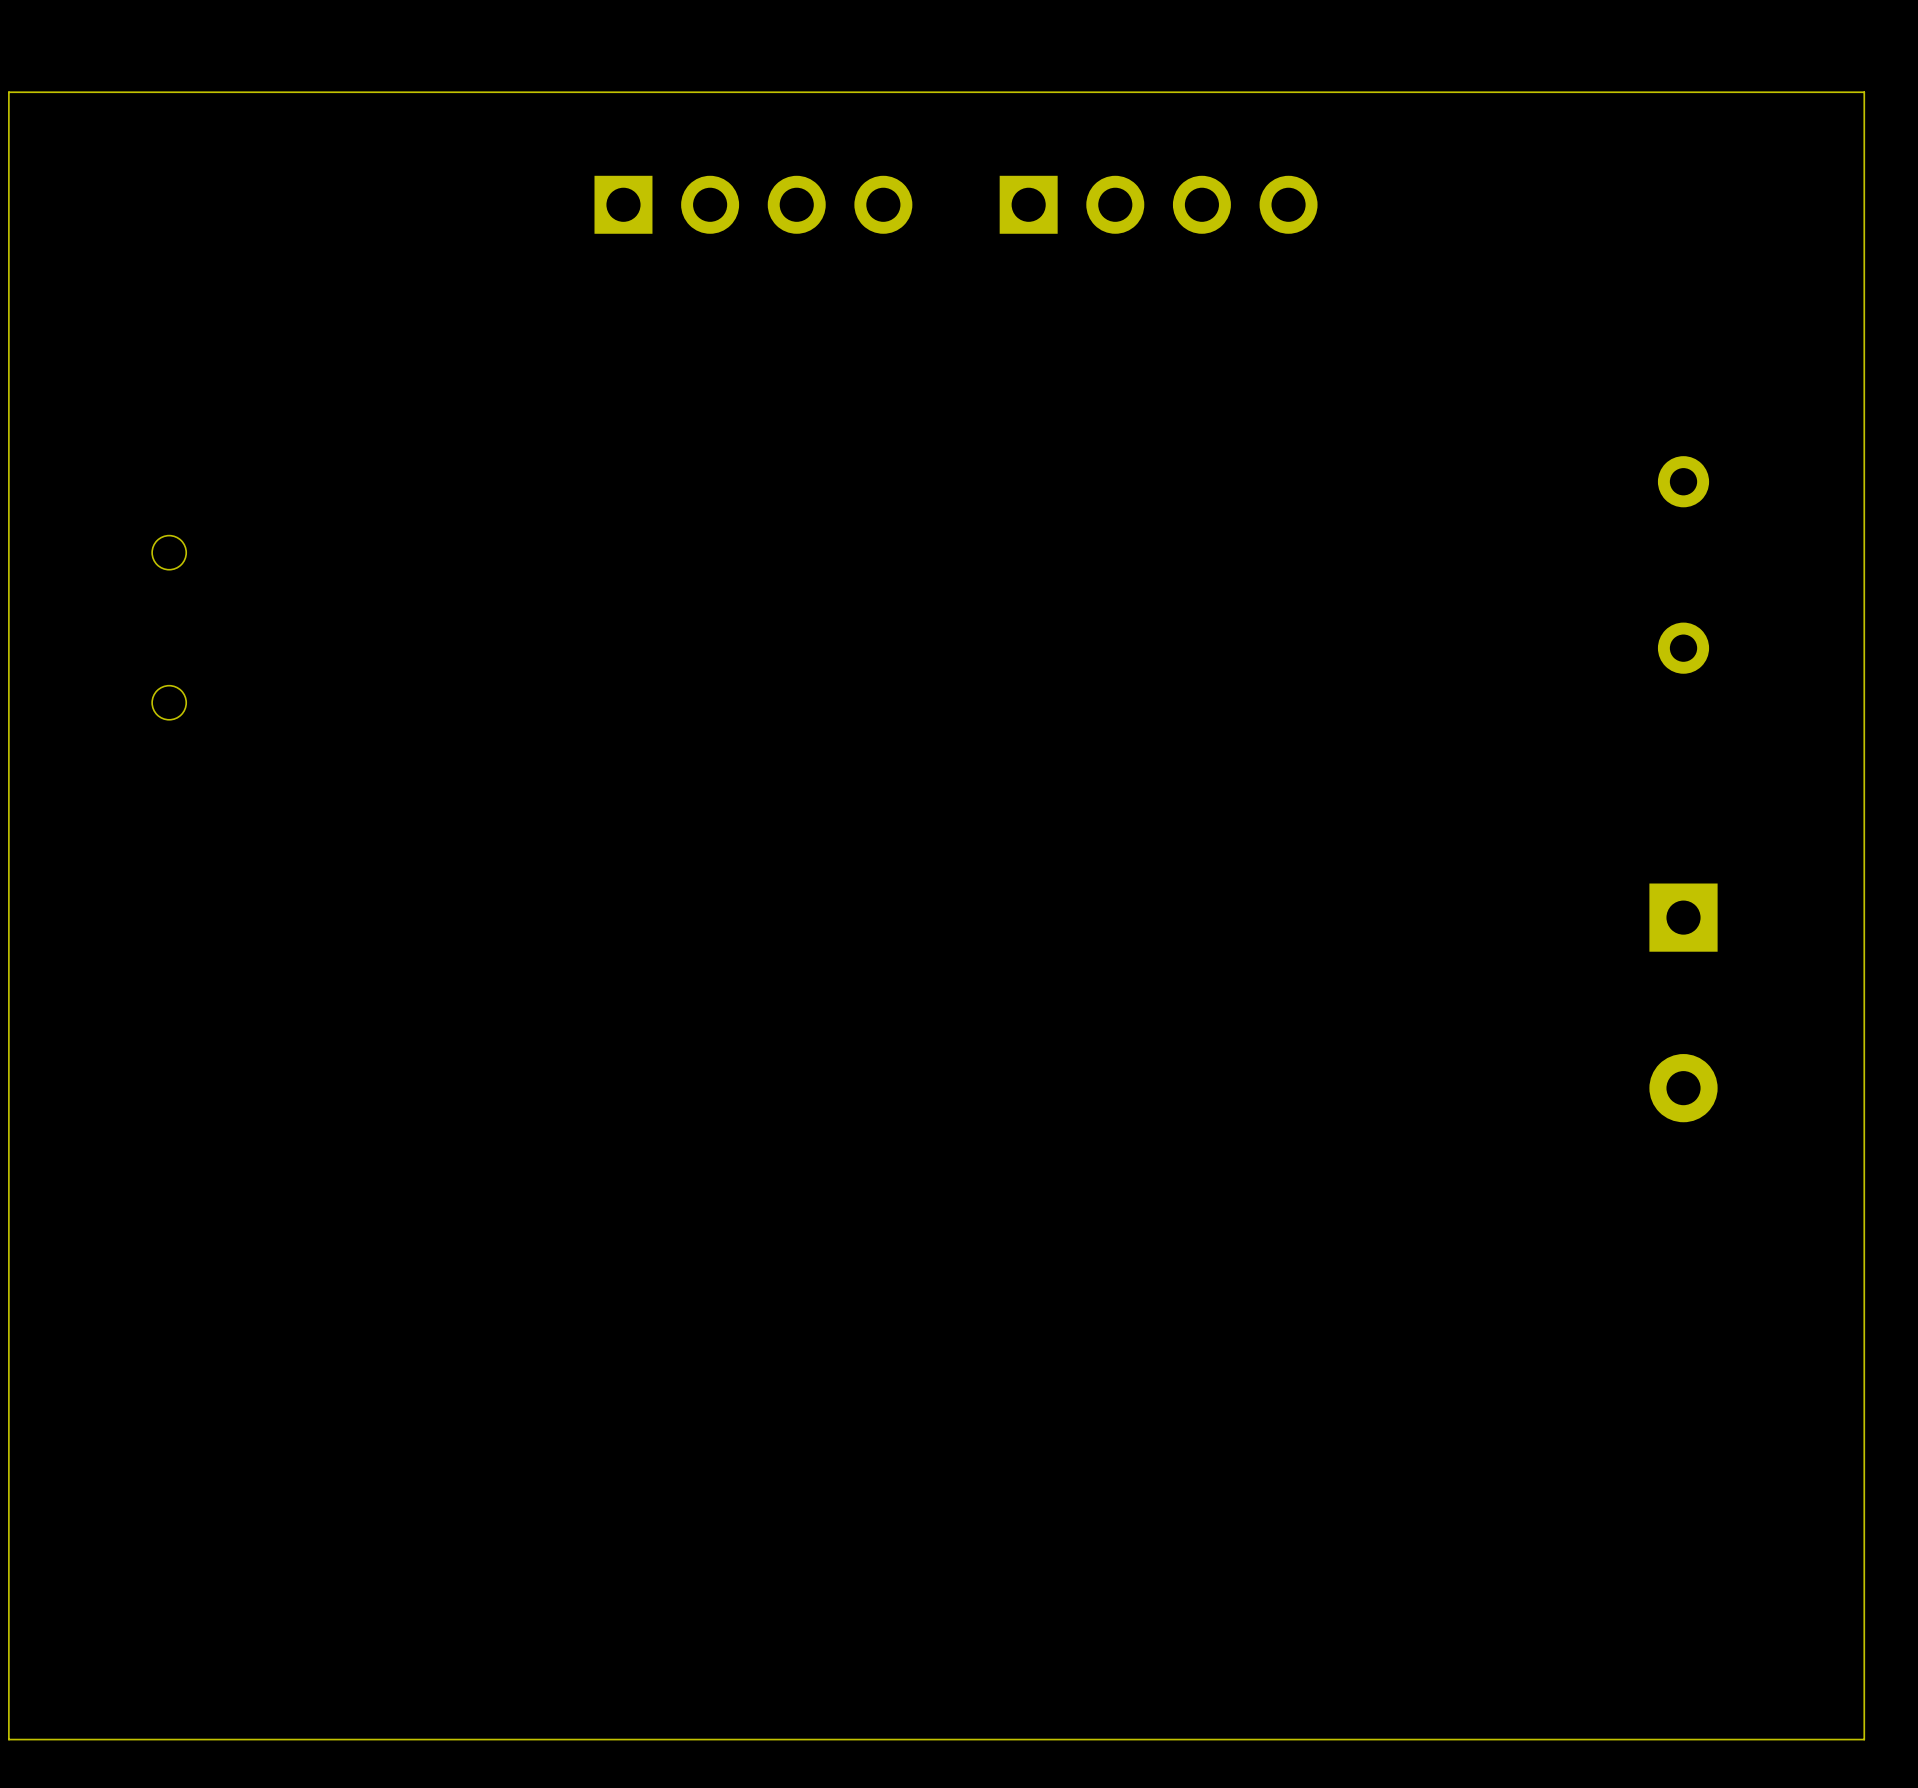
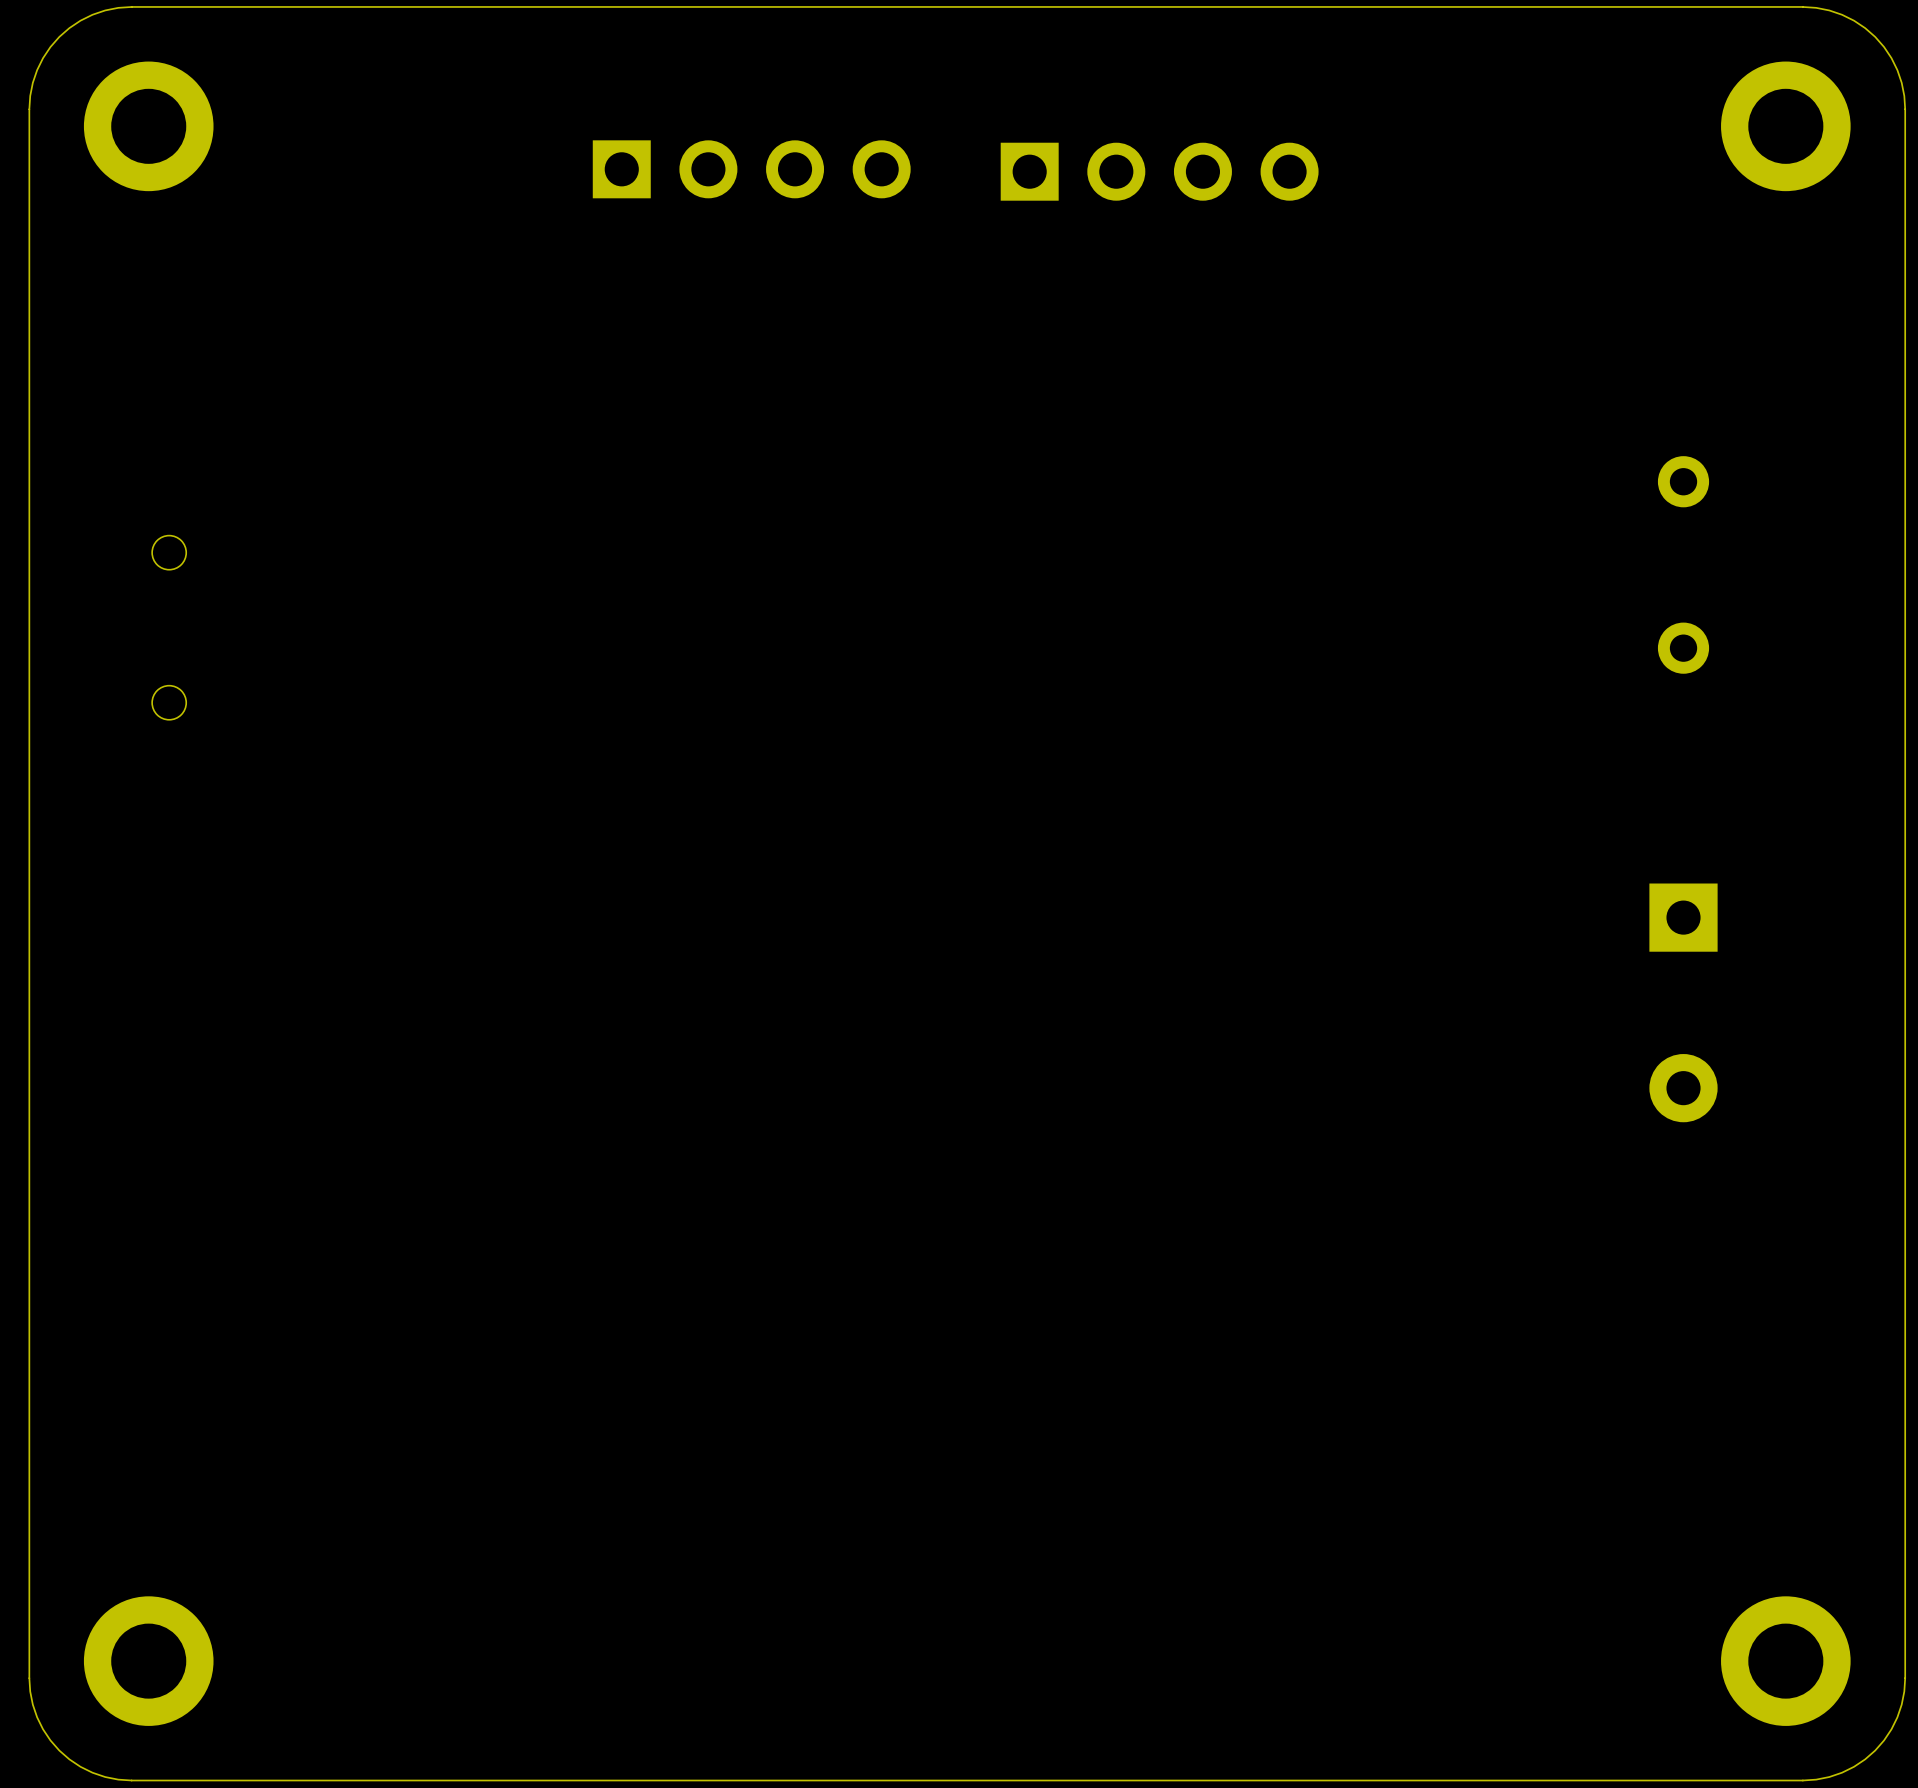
board edge: (1864, 92) (8, 92) (8, 1739) (1864, 1739) (1864, 92) -> (1802, 6) (1829, 10) (1842, 14) (1854, 20) (1875, 36) (1891, 58) (1897, 70) (1901, 82) (1905, 109) (1905, 1678) (1904, 1691) (1897, 1717) (1891, 1729) (1875, 1750) (1854, 1766) (1842, 1772) (1829, 1777) (1802, 1780) (131, 1780) (105, 1777) (92, 1772) (69, 1759) (59, 1750) (50, 1740) (37, 1717) (32, 1704) (29, 1678) (29, 109) (32, 82) (37, 70) (50, 47) (59, 36) (80, 20) (92, 14) (118, 7) (131, 6) (1802, 6)
part: none -> (148, 126)
part: none -> (1785, 126)
part position: (753, 204) -> (751, 169)
part position: (1158, 204) -> (1159, 171)
part: none -> (148, 1661)
part: none -> (1785, 1661)

